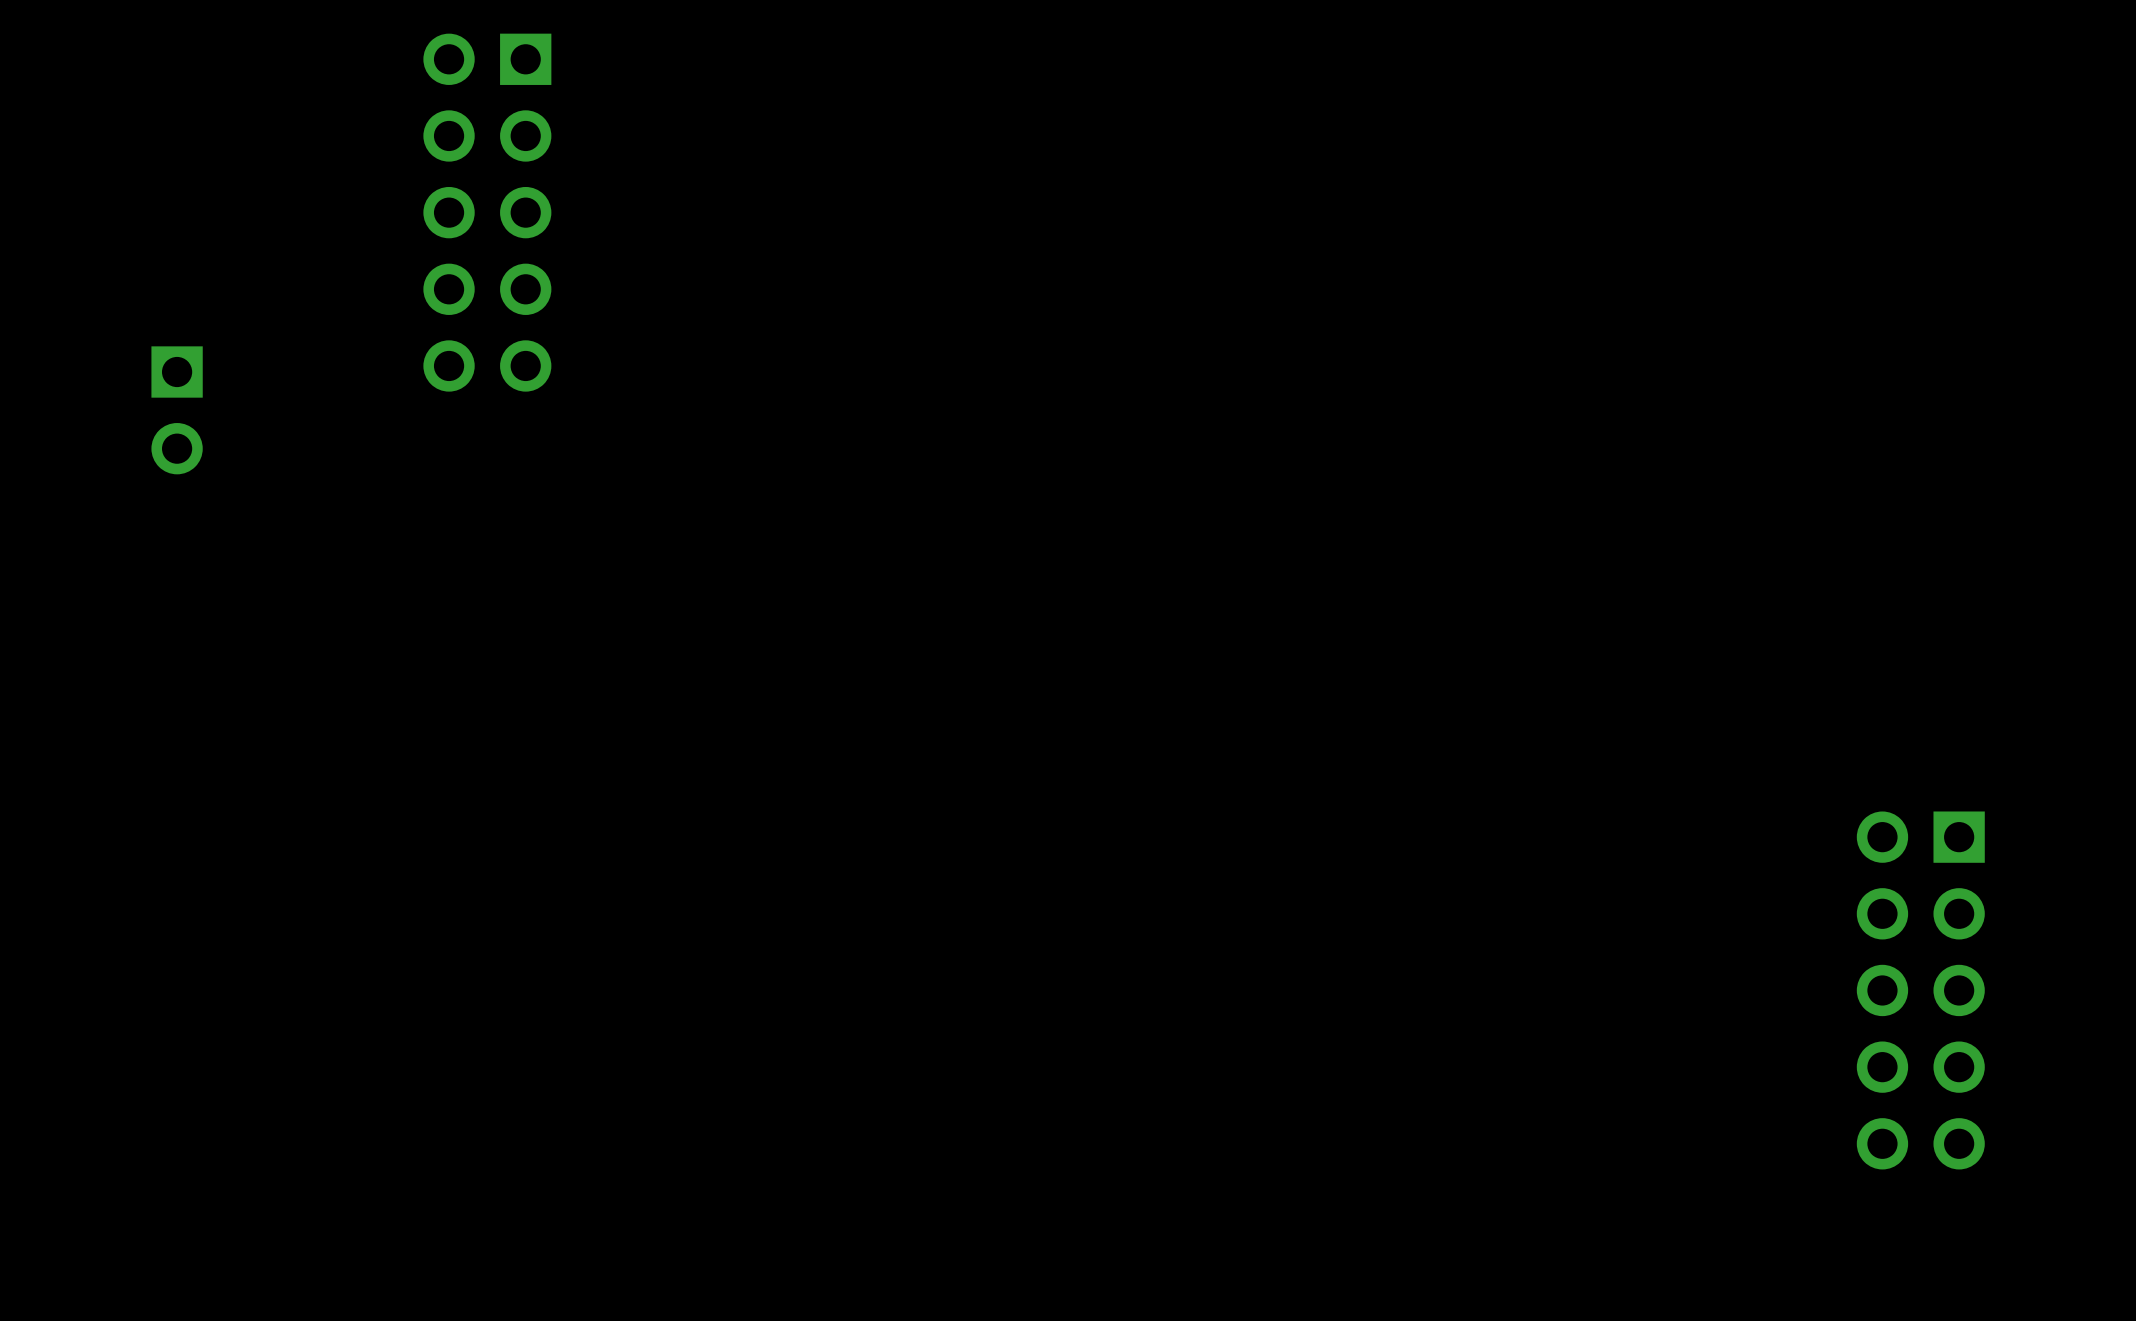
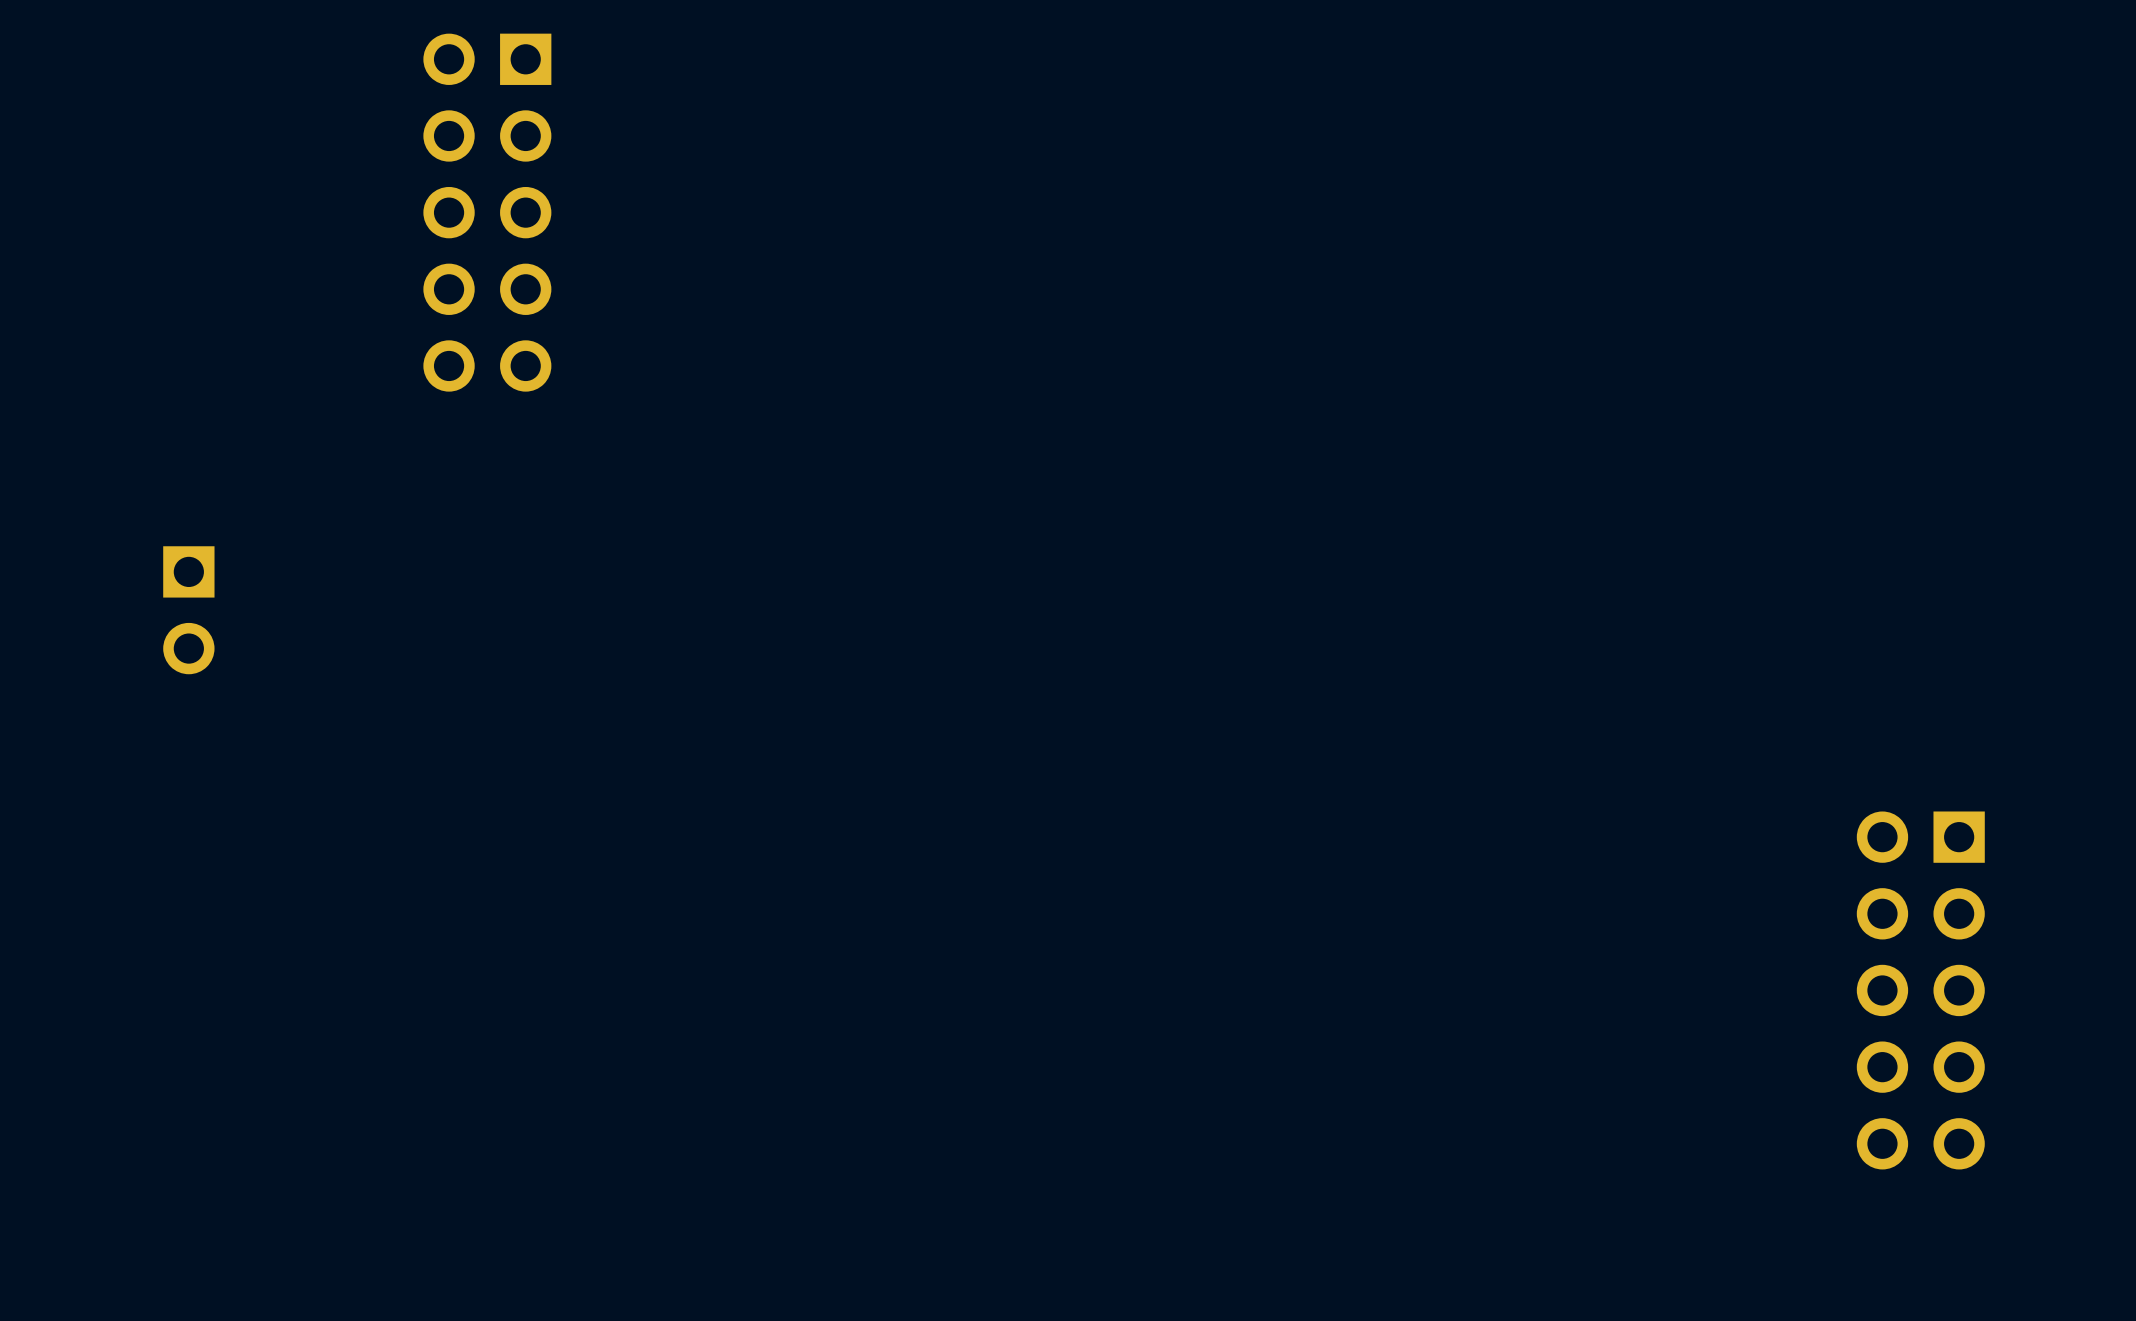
part position: (177, 410) -> (188, 610)

